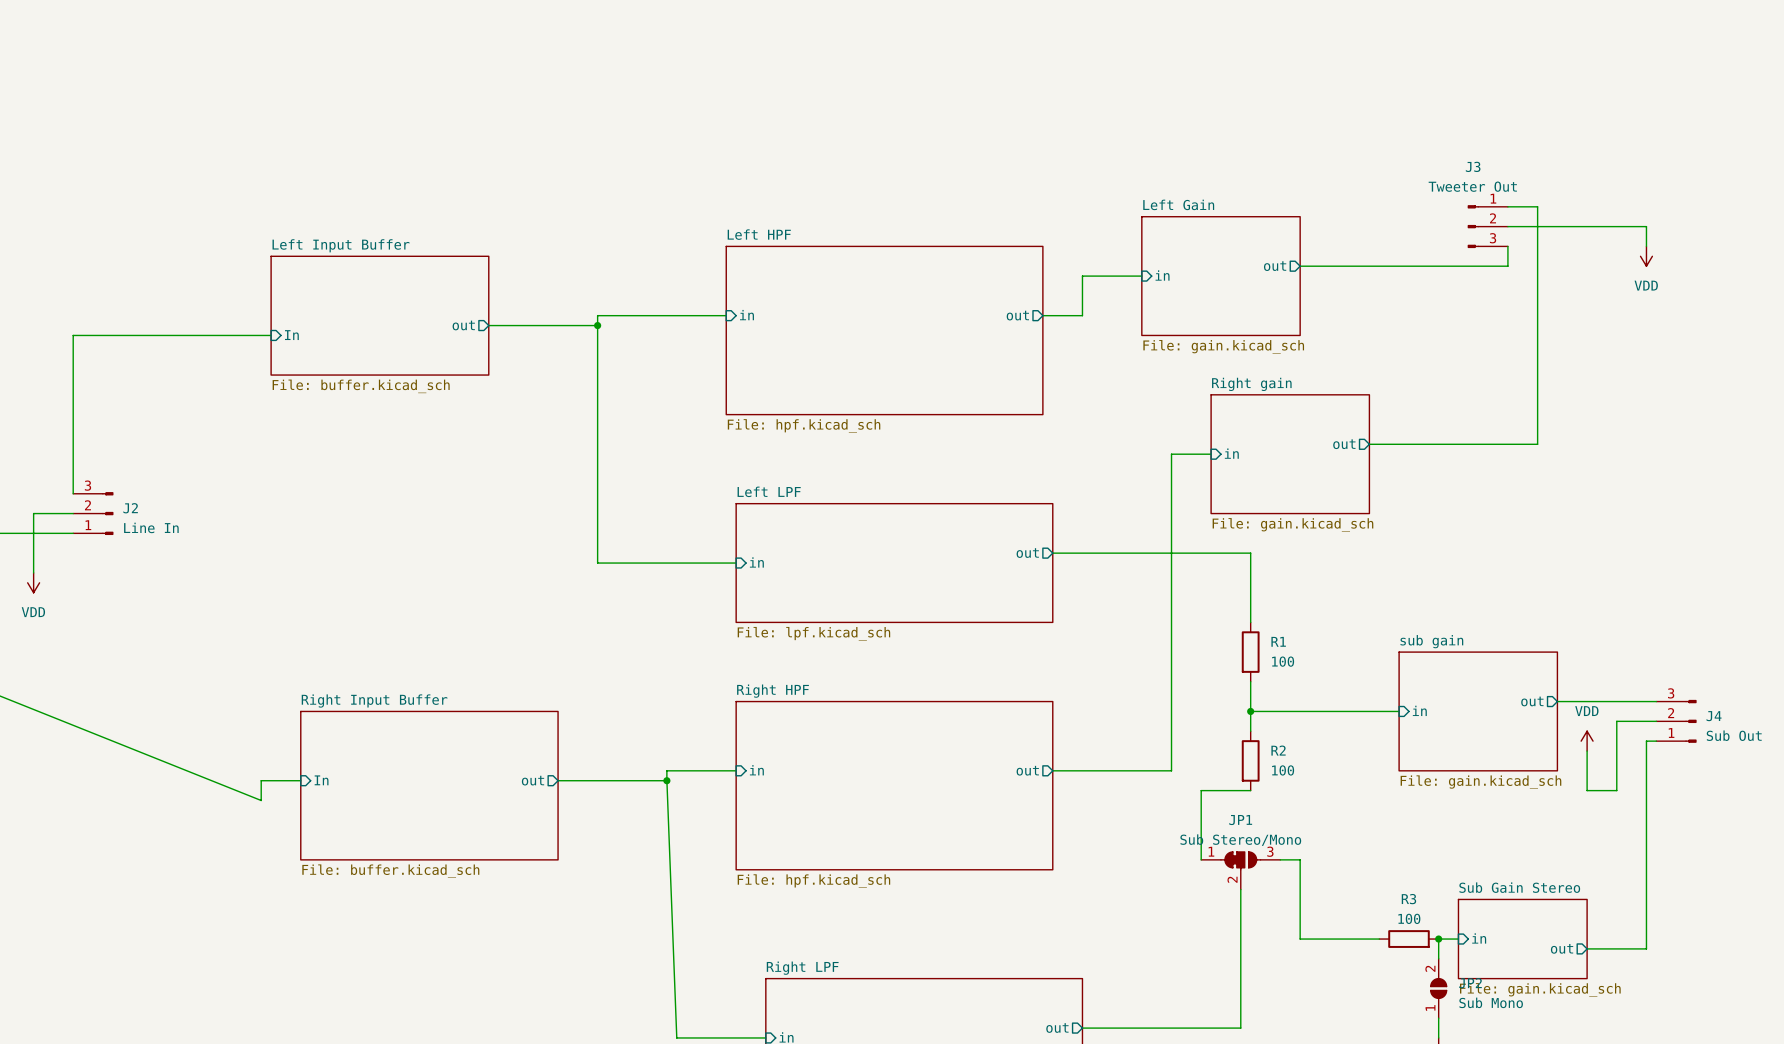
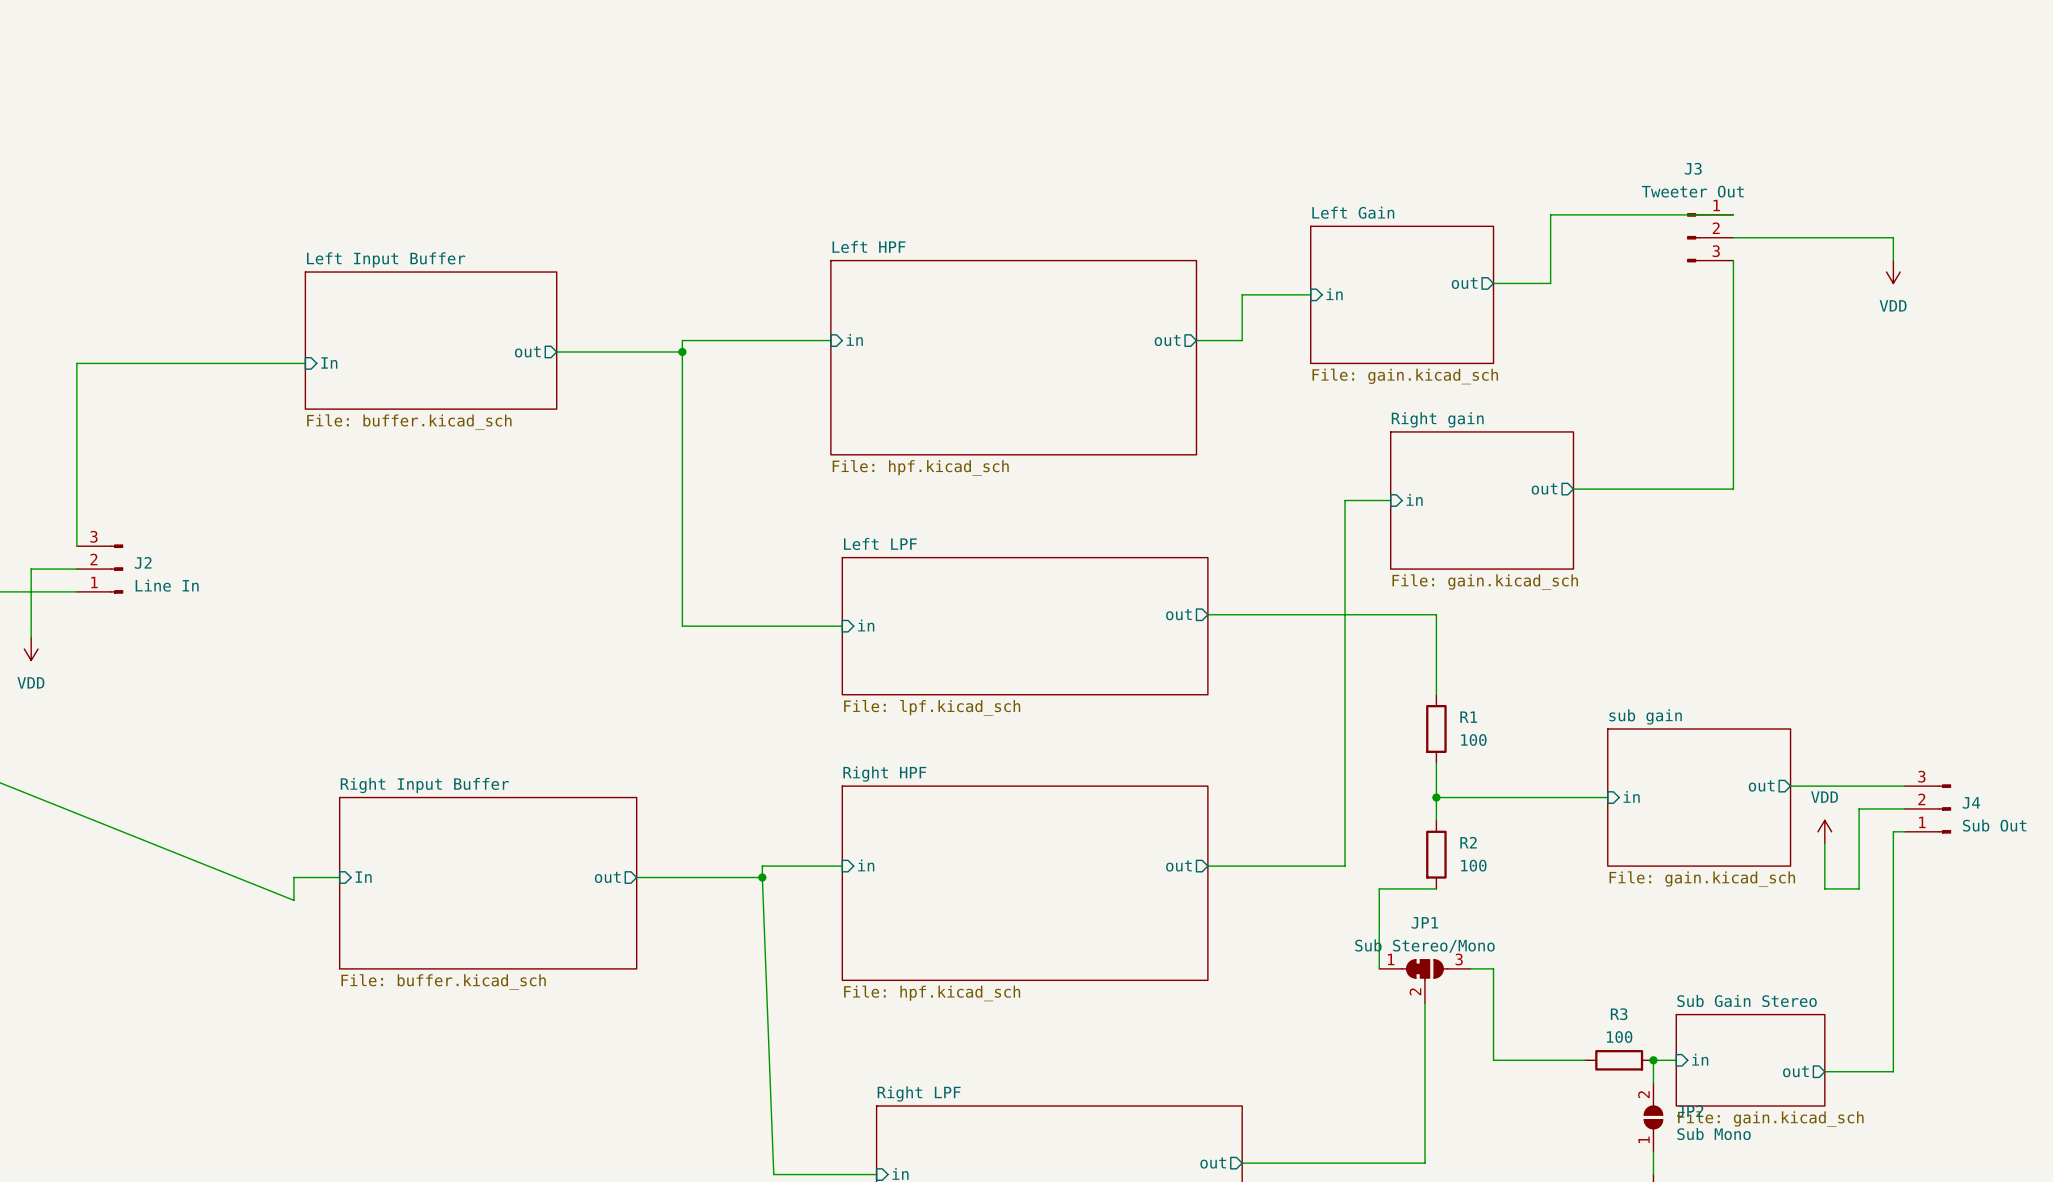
wire: (1507, 206) (1537, 206) (1537, 444) (1507, 444) -> (1733, 283) (1733, 489)
wire: (1349, 266) (1507, 266) -> (1550, 283) (1550, 214) (1733, 214)

